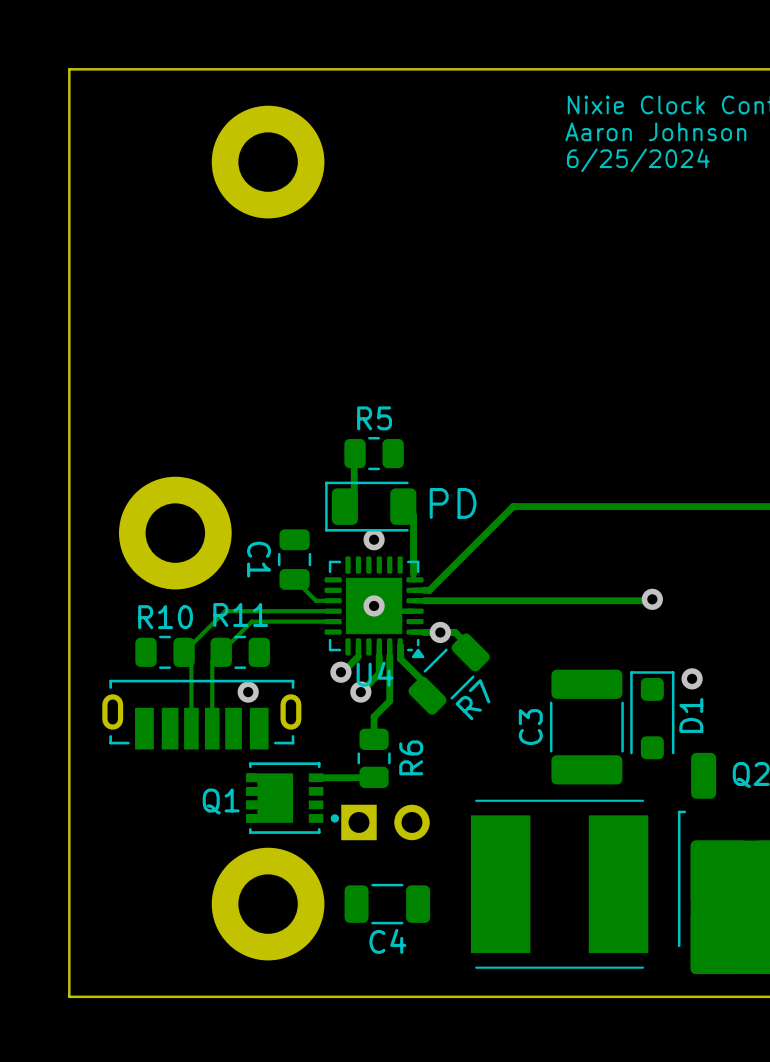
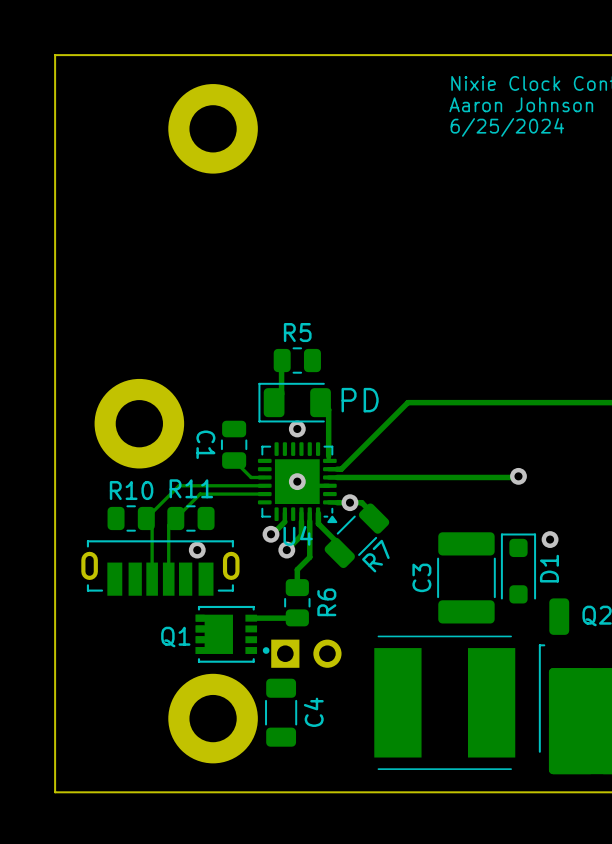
C4 rotation: 0° (387, 904) -> 90° clockwise (281, 712)
C4 name position: C4 (387, 941) -> C4 (313, 712)

